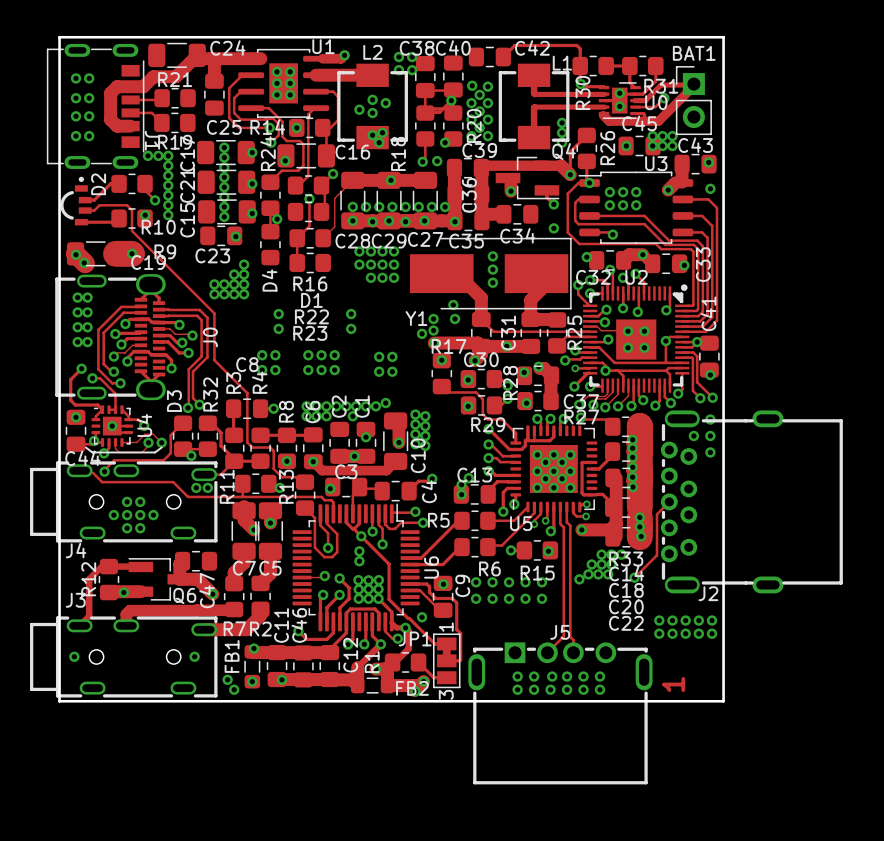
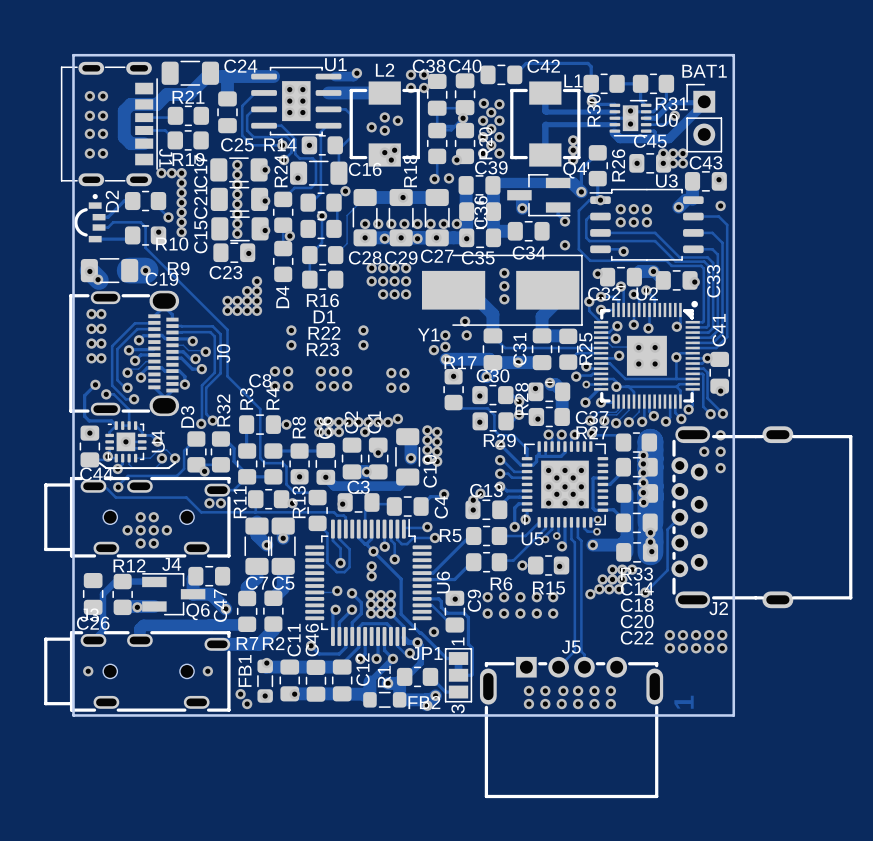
J4 name position: J4 (76, 550) -> J4 (171, 564)
C26: none -> (93, 593)
R12 name rotation: 0° (88, 579) -> 90° clockwise (129, 565)

